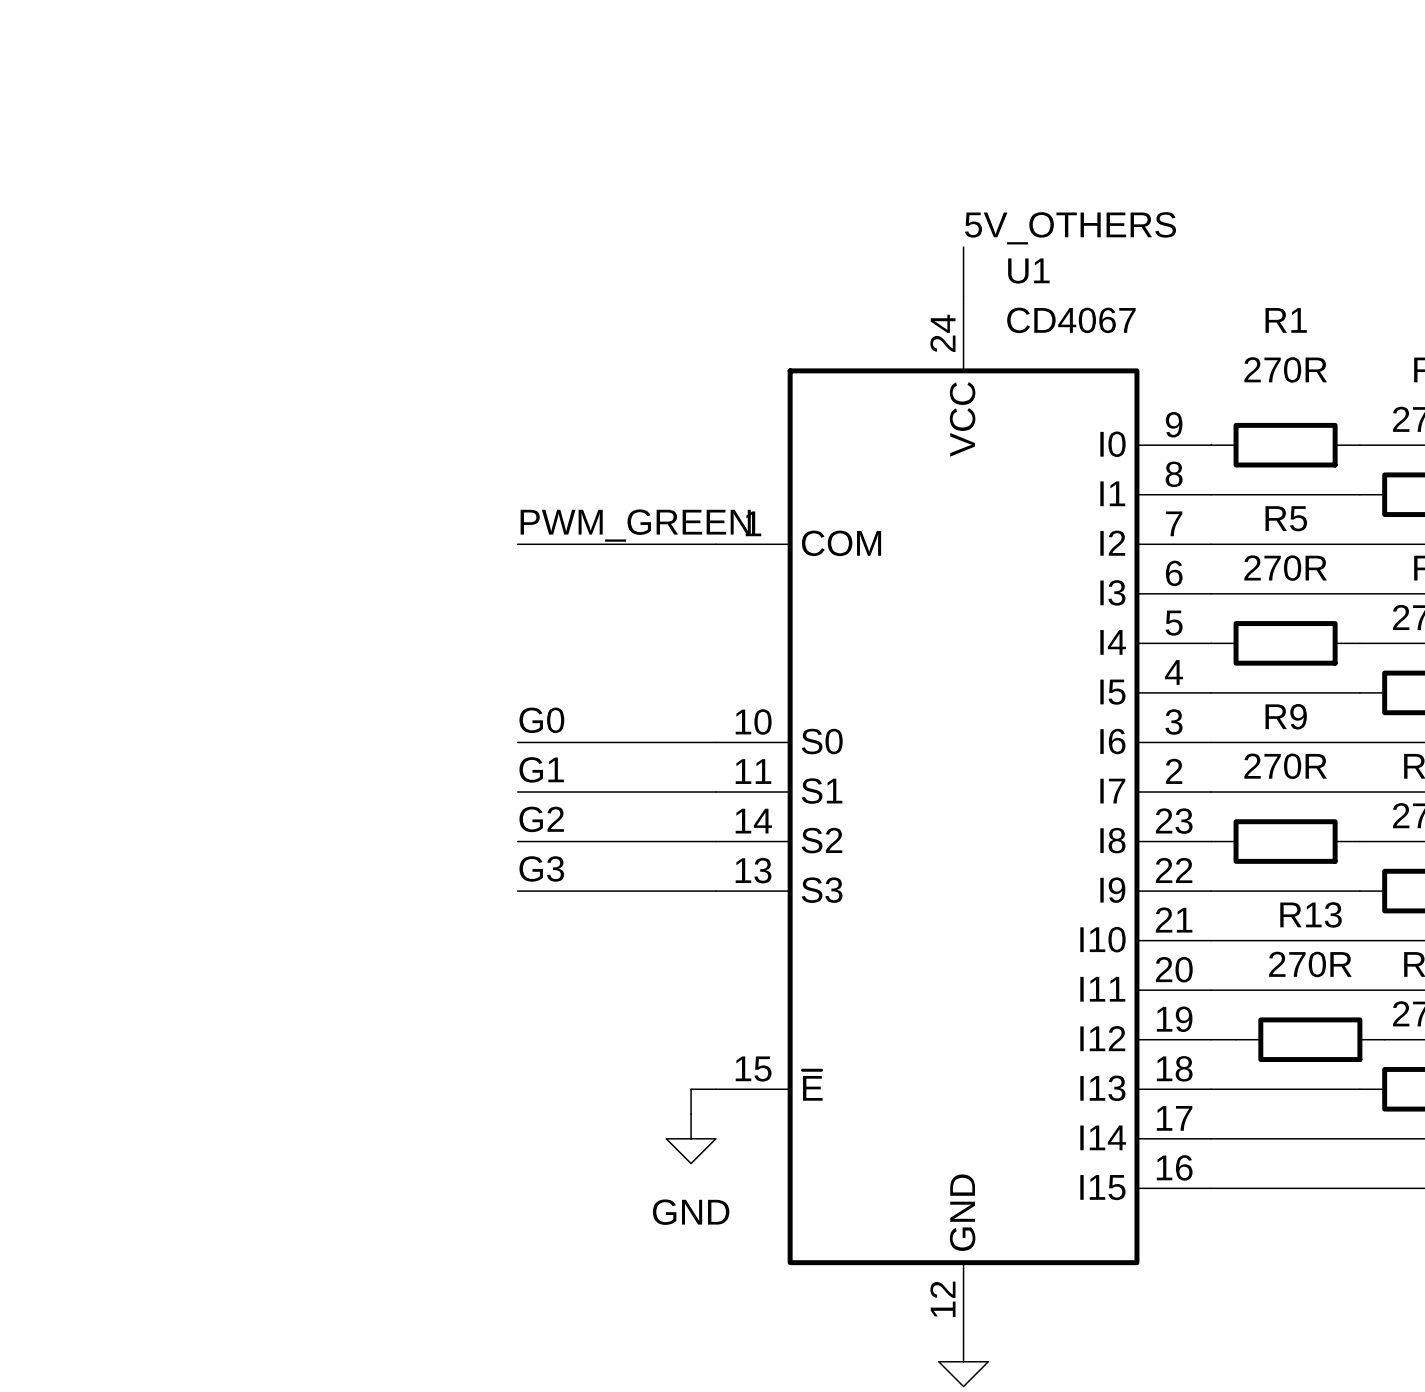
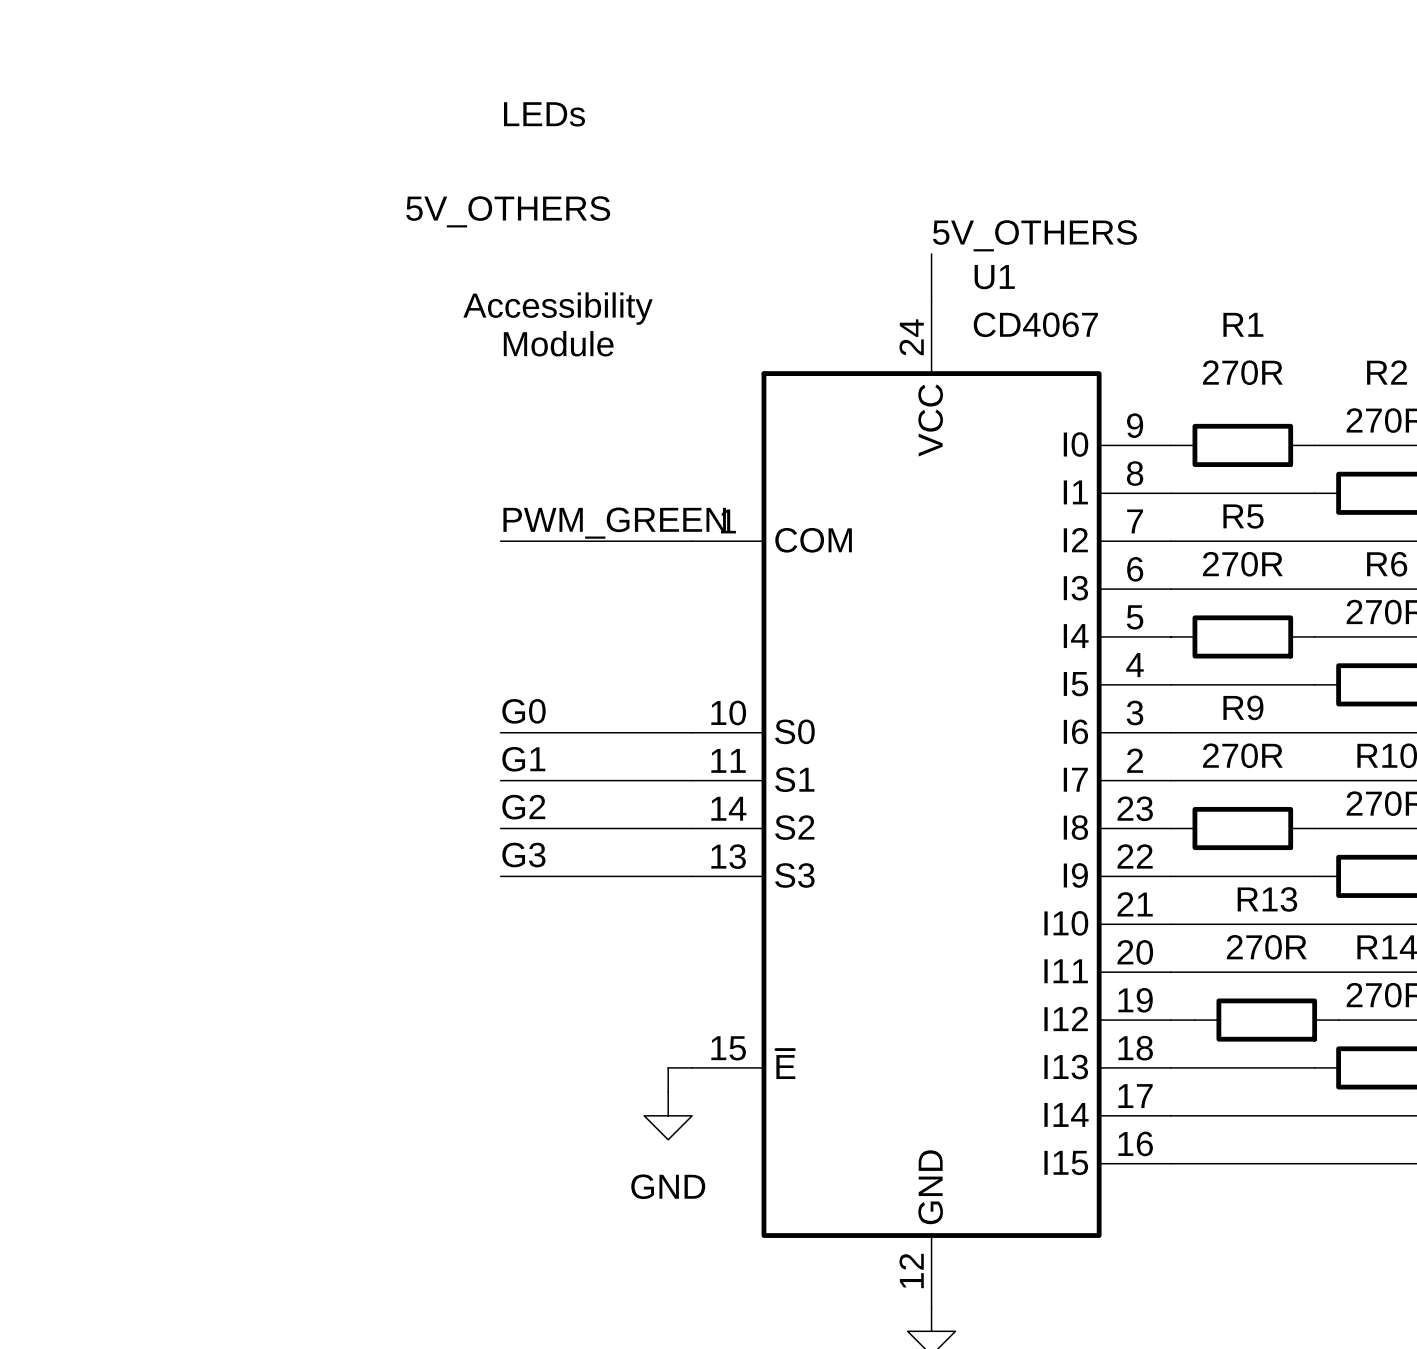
text: none -> LEDs (544, 114)
label: none -> 5V_OTHERS (508, 211)
text: none -> Accessibility (558, 308)
text: none -> Module (558, 343)

